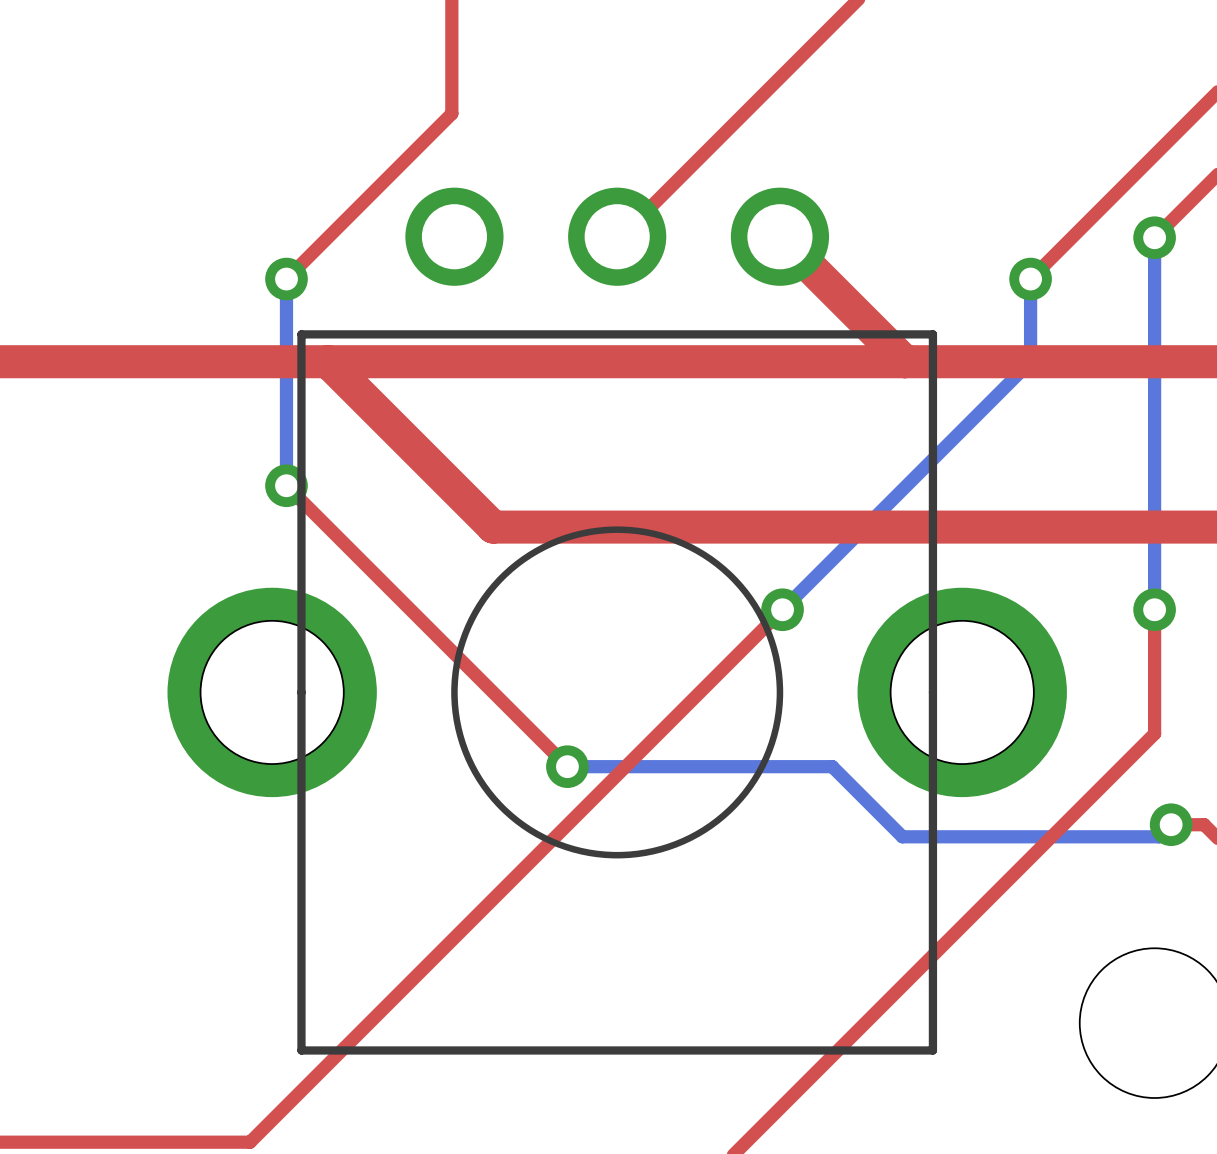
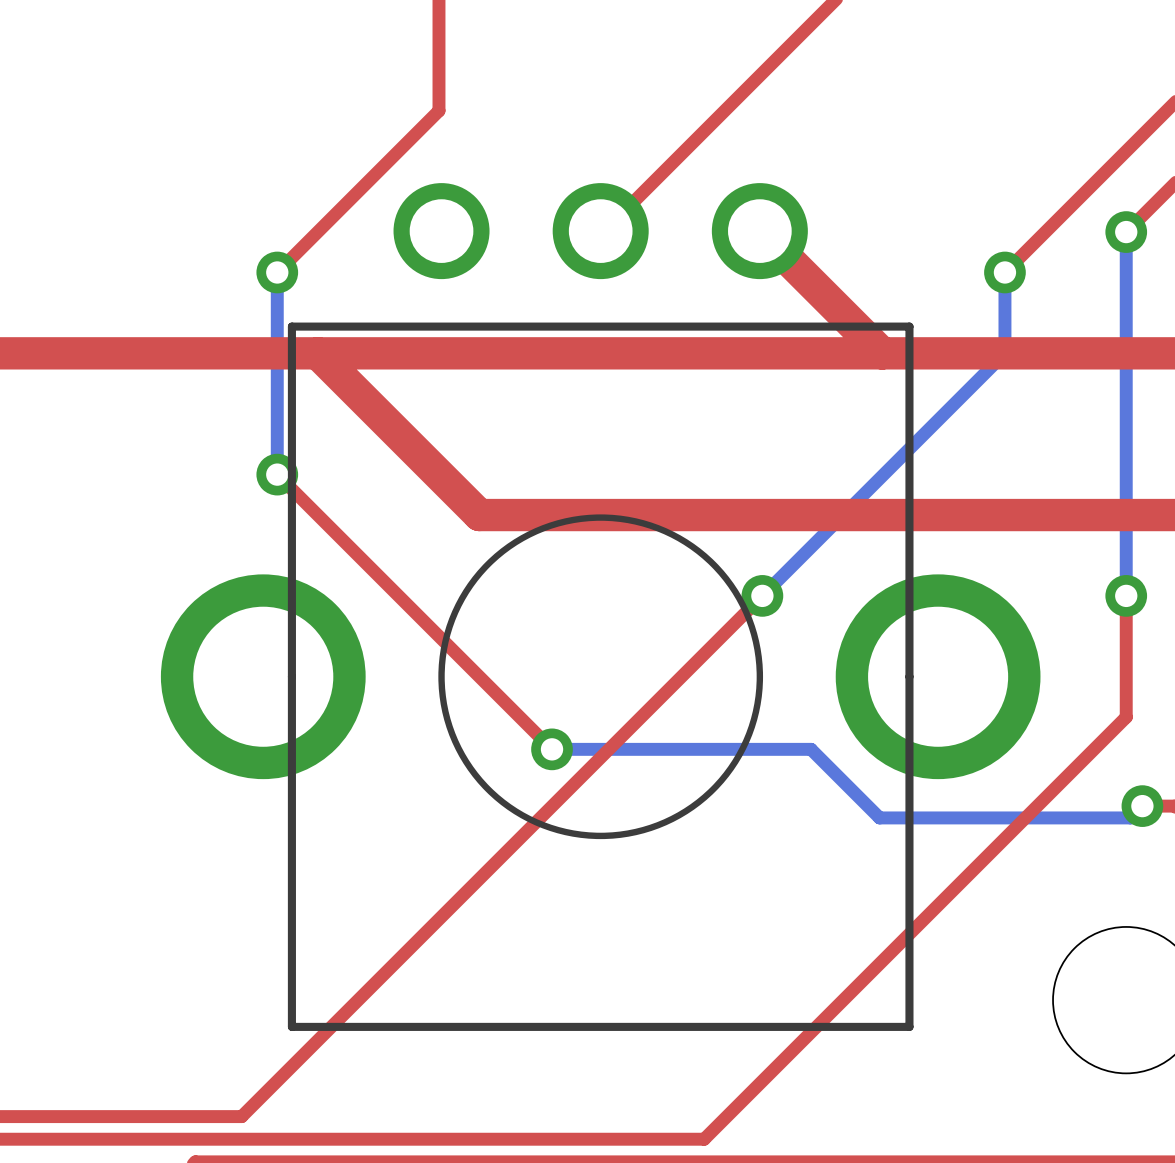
part footprint: [167, 187, 1067, 1055] -> [160, 183, 1041, 1031]

